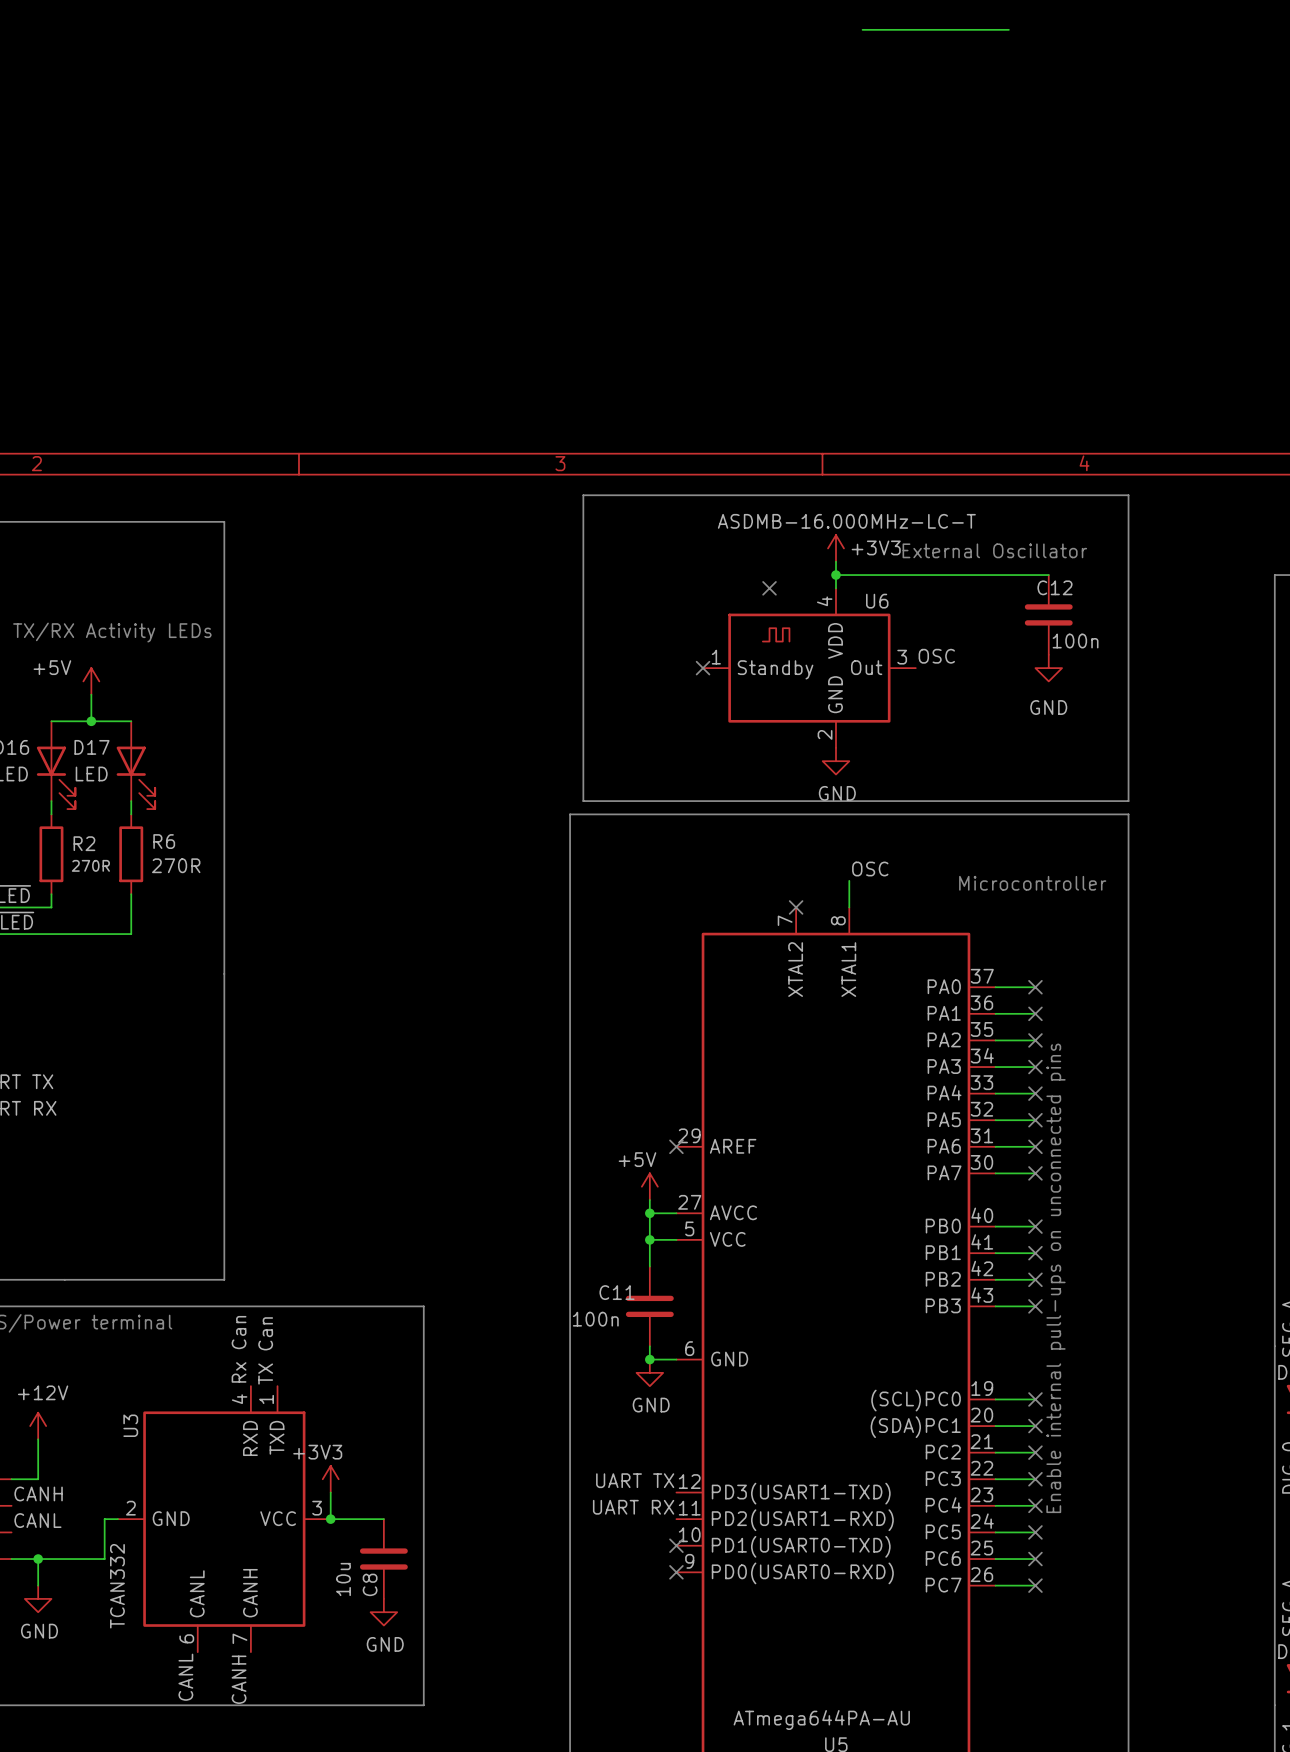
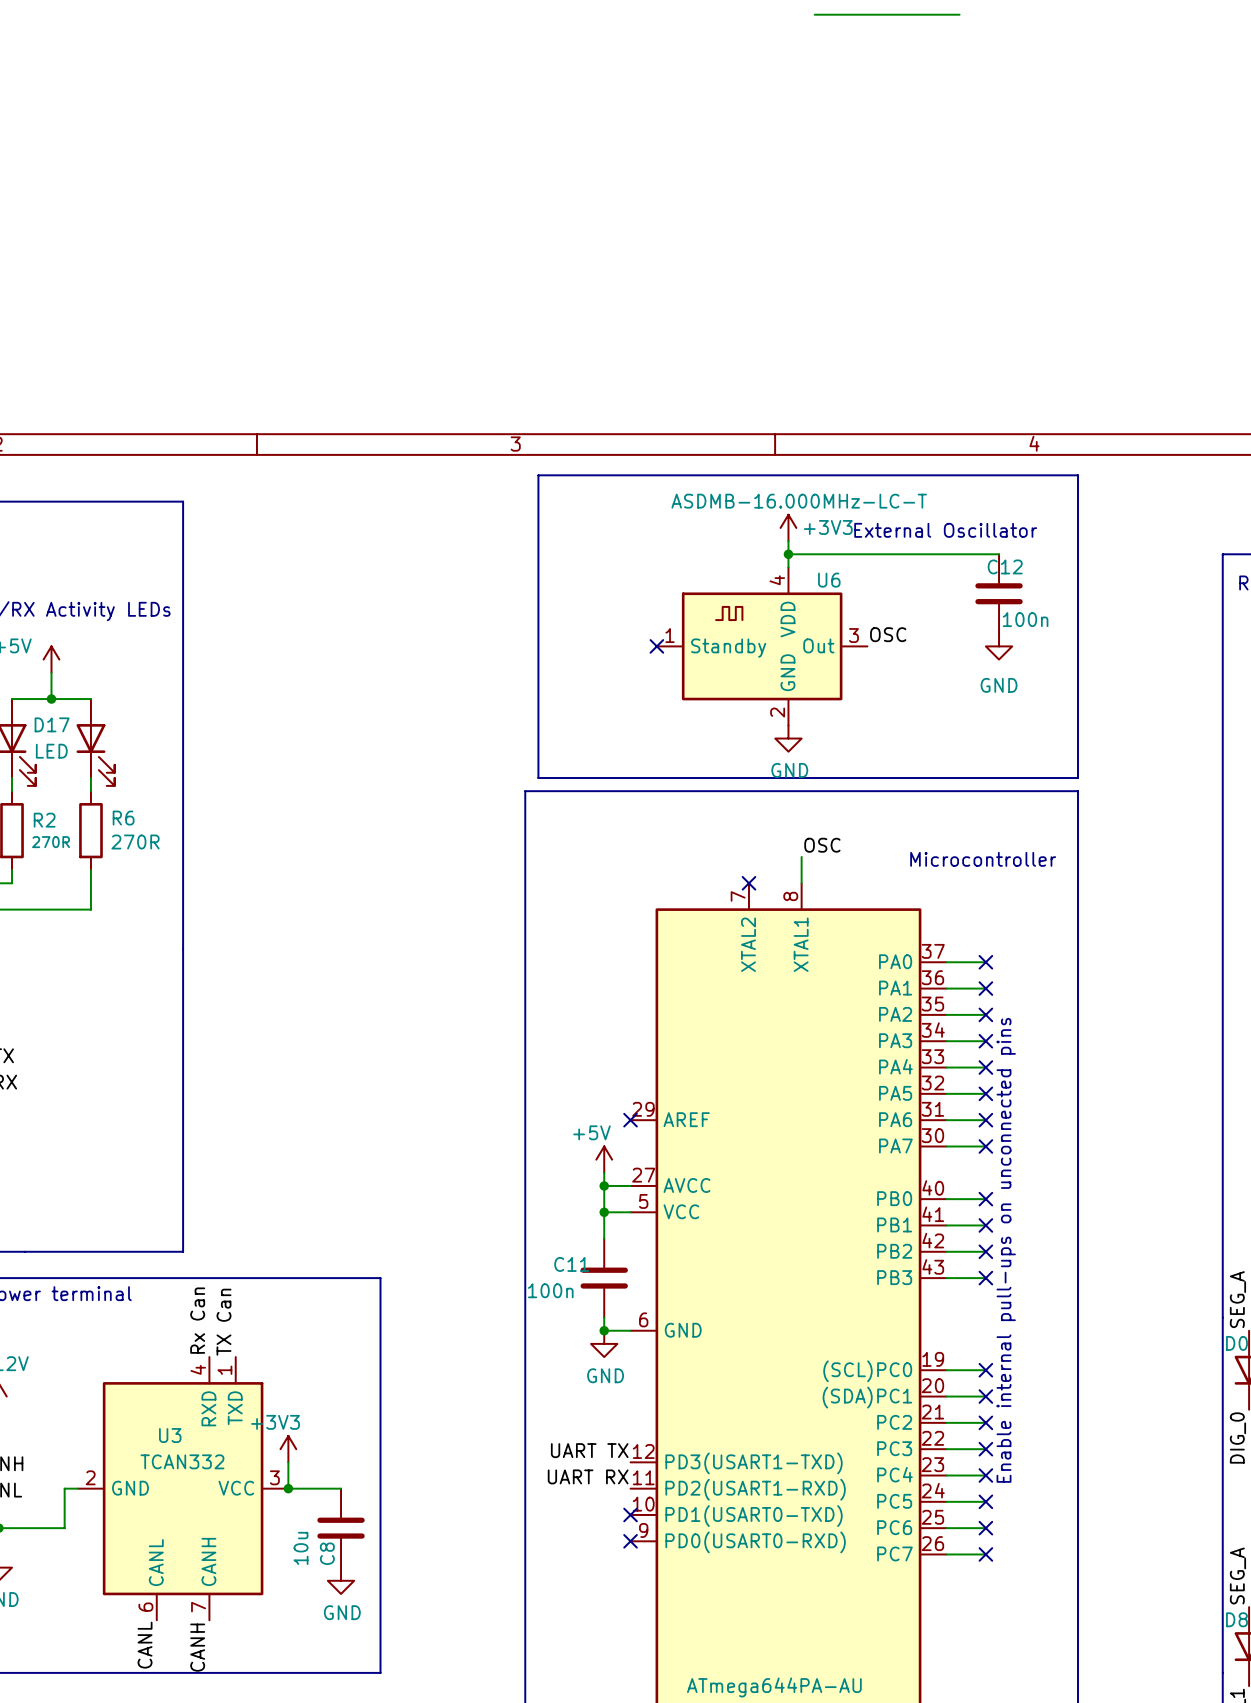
no-connect mark: (769, 588) -> none
U3 name rotation: 0° (130, 1425) -> 90° clockwise (170, 1435)
U3 name position: U3 (130, 1425) -> U3 (170, 1435)
U3 value rotation: 0° (117, 1586) -> 90° clockwise (182, 1461)
U3 value position: TCAN332 (117, 1586) -> TCAN332 (182, 1461)

